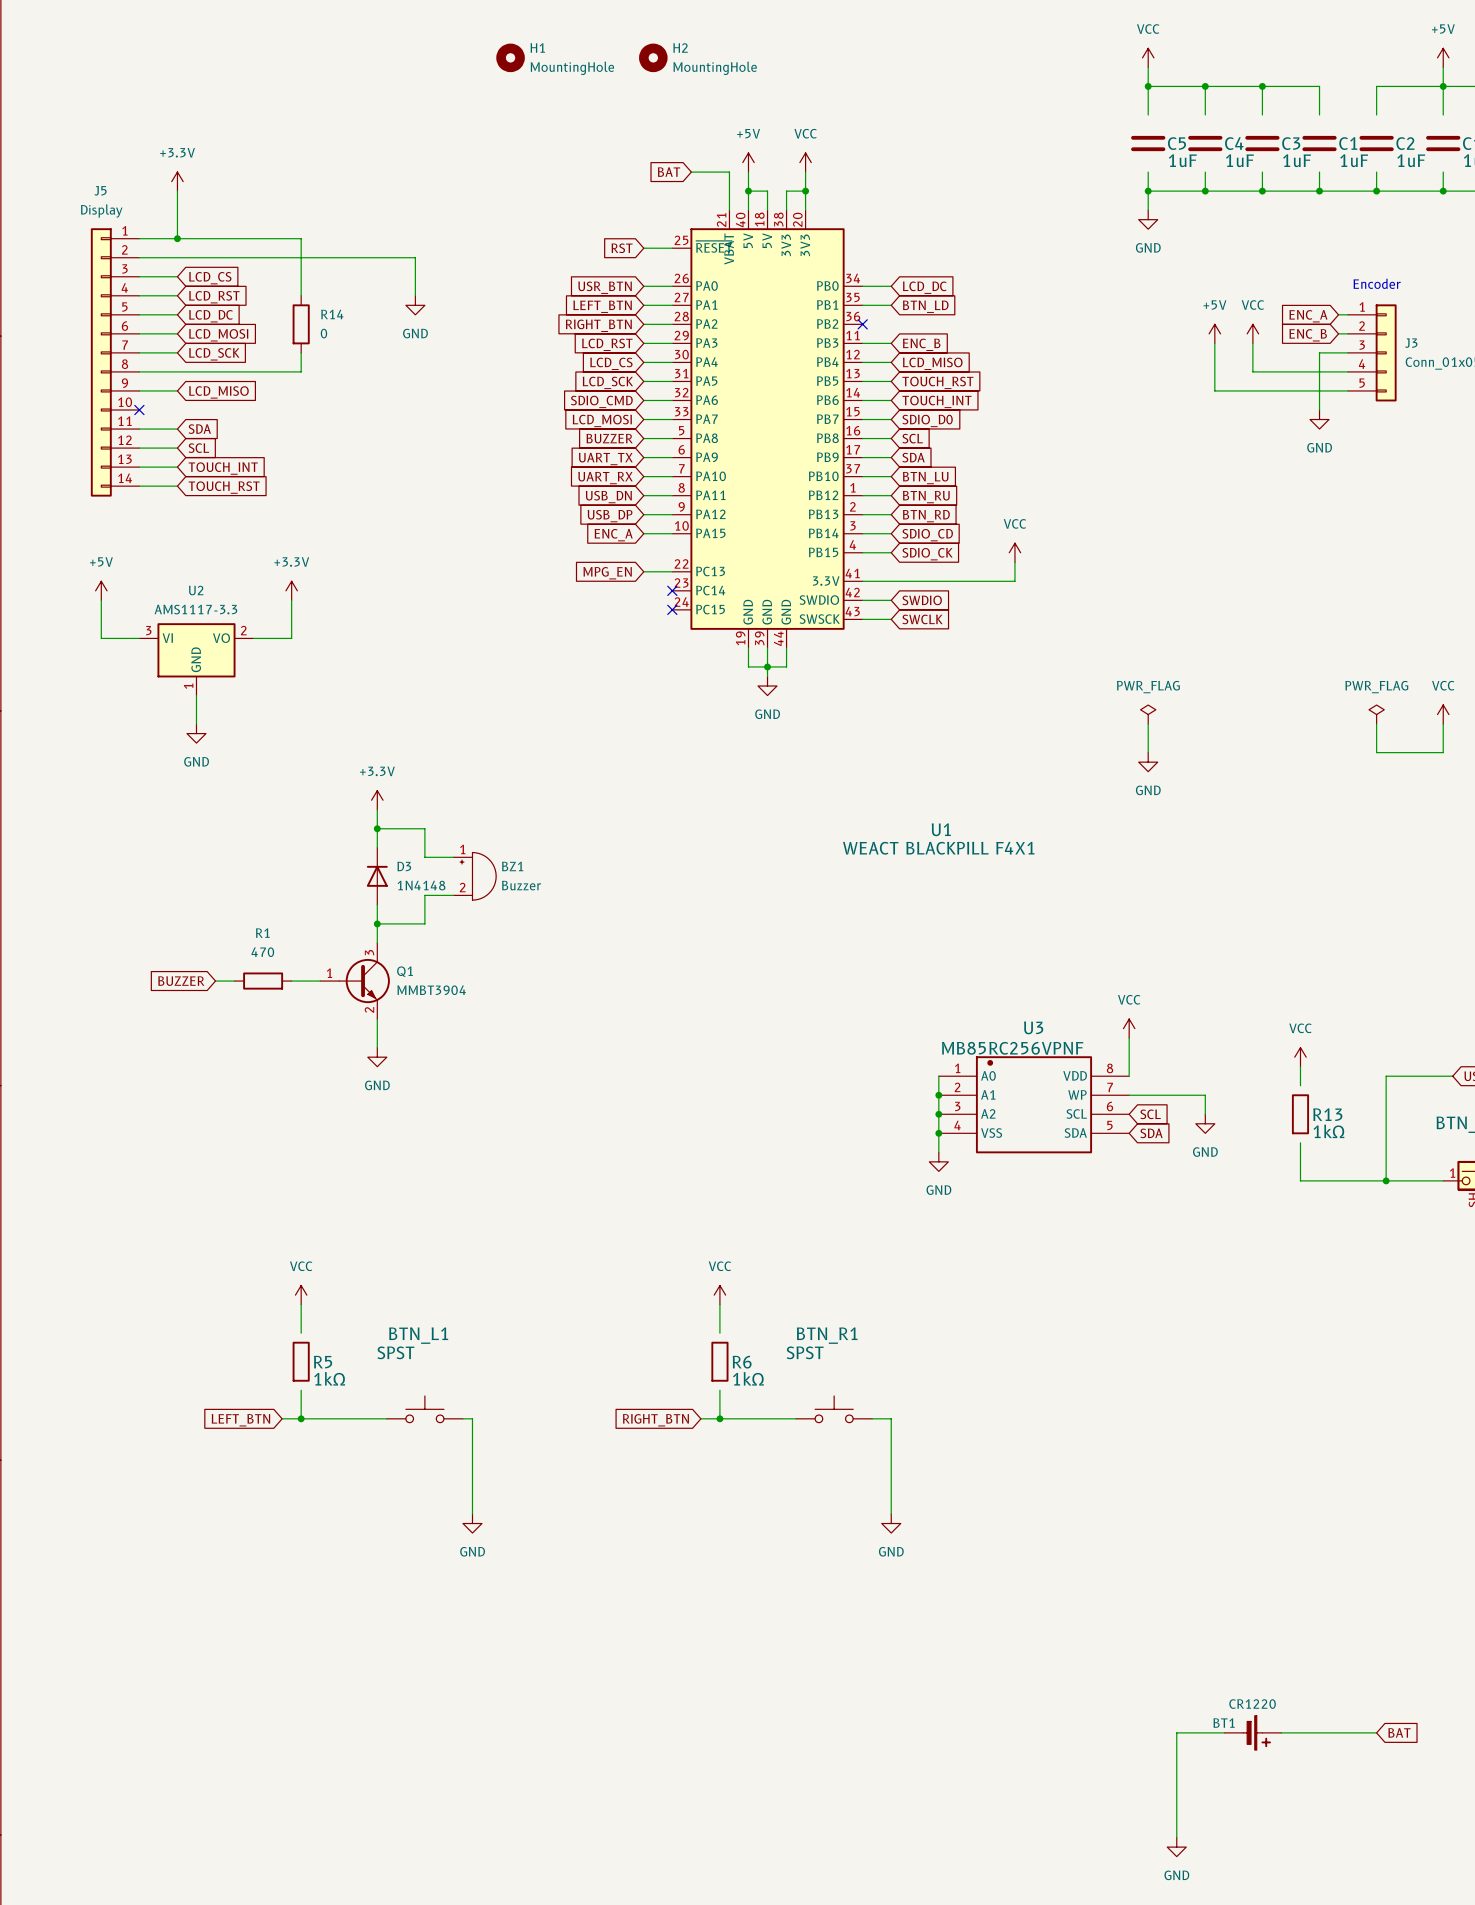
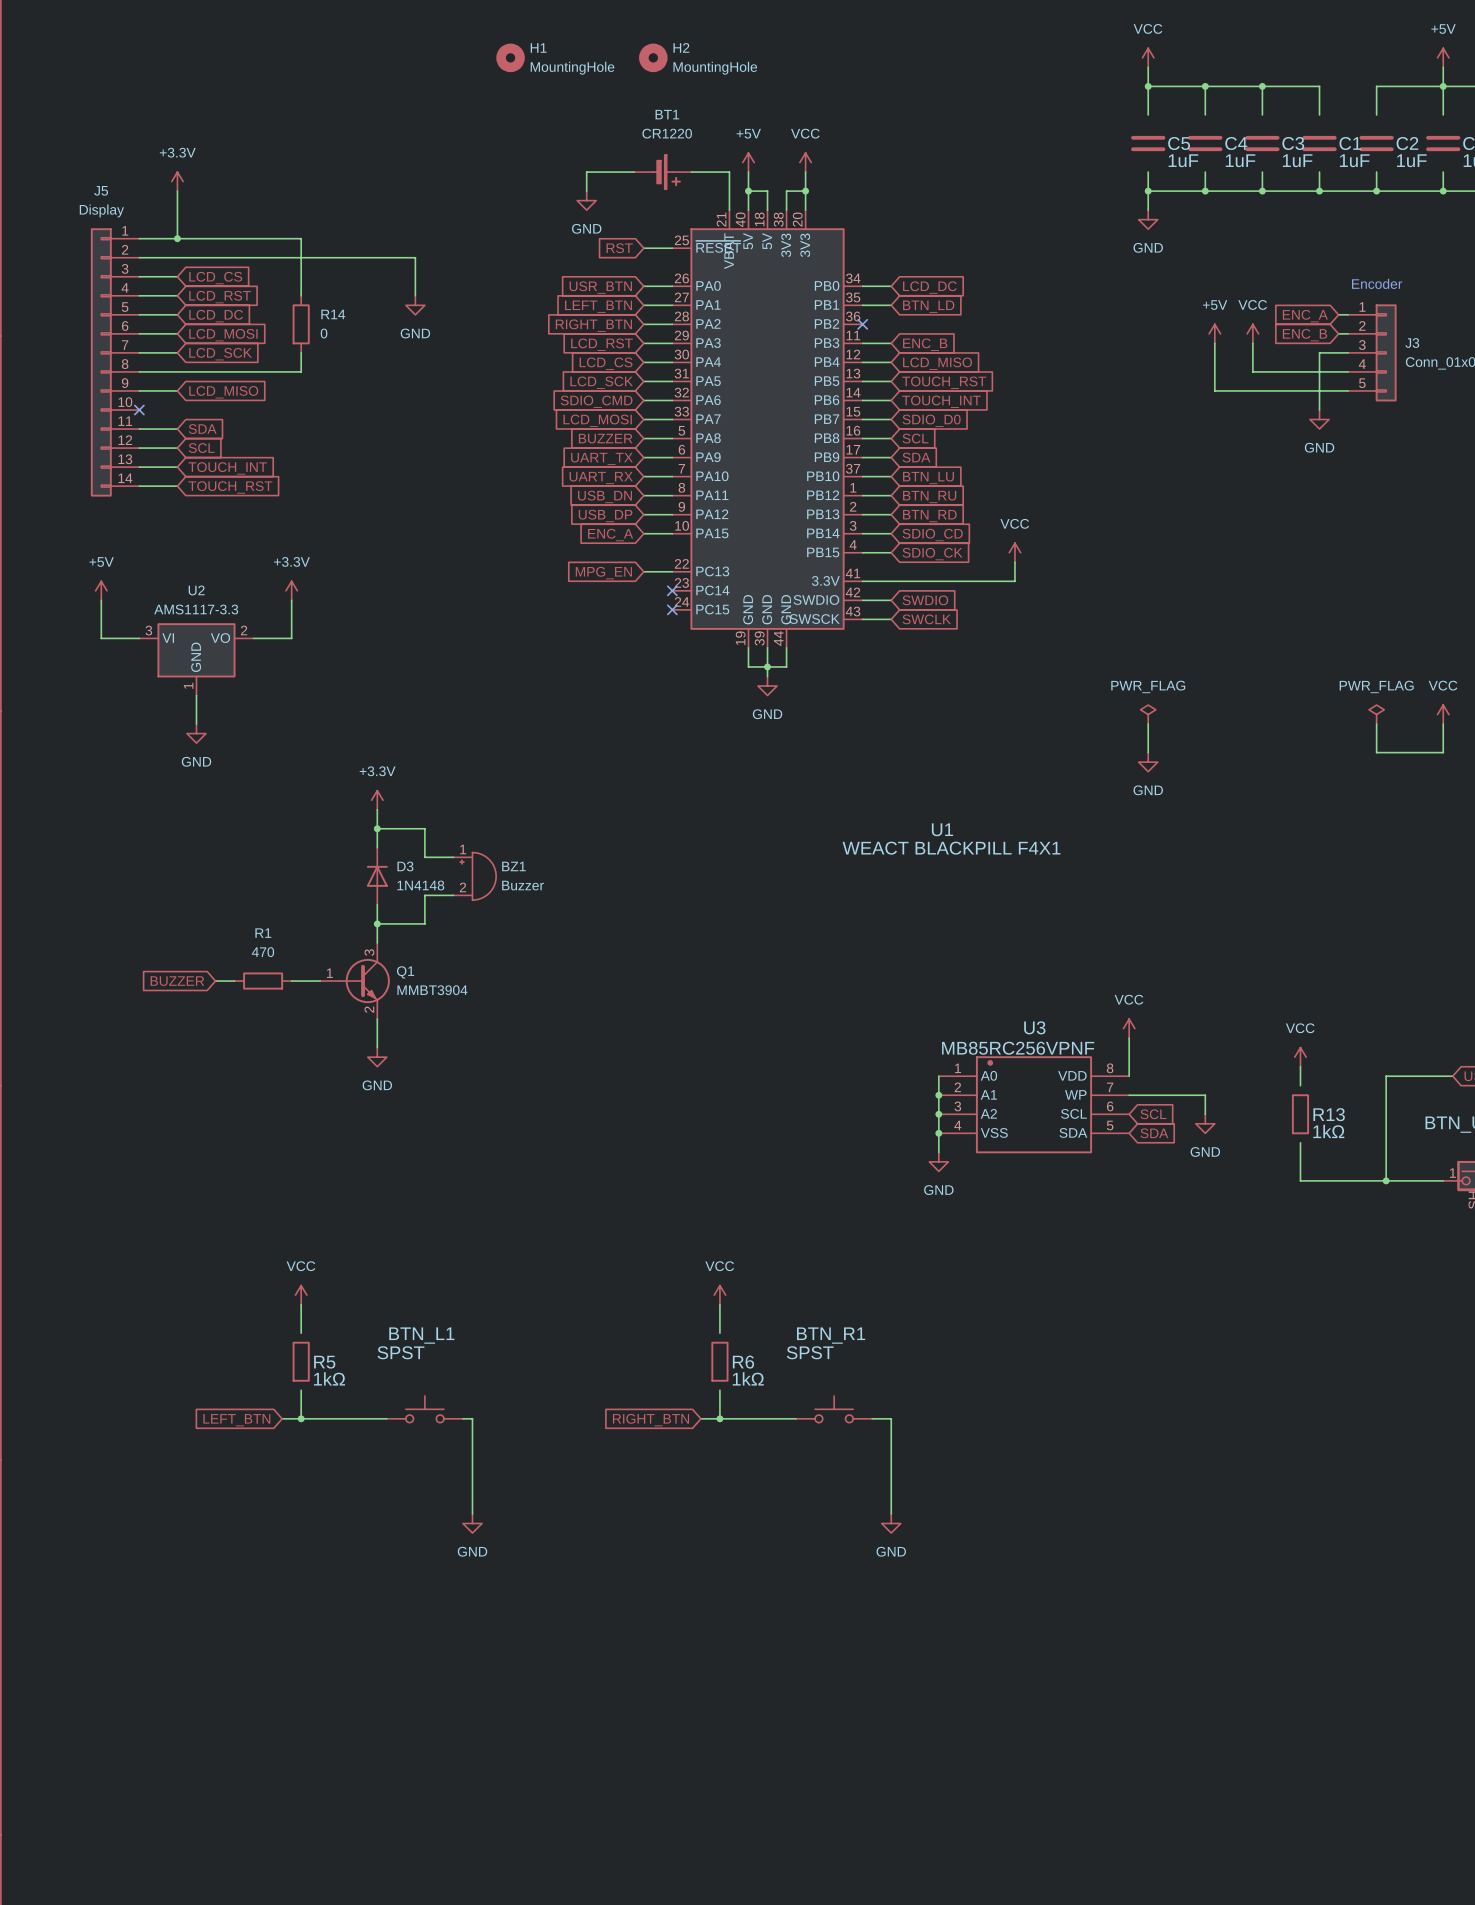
wire: none -> (634, 172) (586, 172) (586, 191)
global label: BAT (669, 172) -> none
power symbol: none -> GND (586, 200)
BT1 value position: CR1220 (1252, 1704) -> CR1220 (667, 133)
BT1 name position: BT1 (1224, 1723) -> BT1 (667, 114)
wire: (1224, 1732) (1176, 1732) (1176, 1837) -> none
BT1 position: (1252, 1732) -> (662, 172)
wire: (1281, 1732) (1376, 1732) -> none
global label: BAT (1399, 1732) -> none
power symbol: GND (1176, 1847) -> none

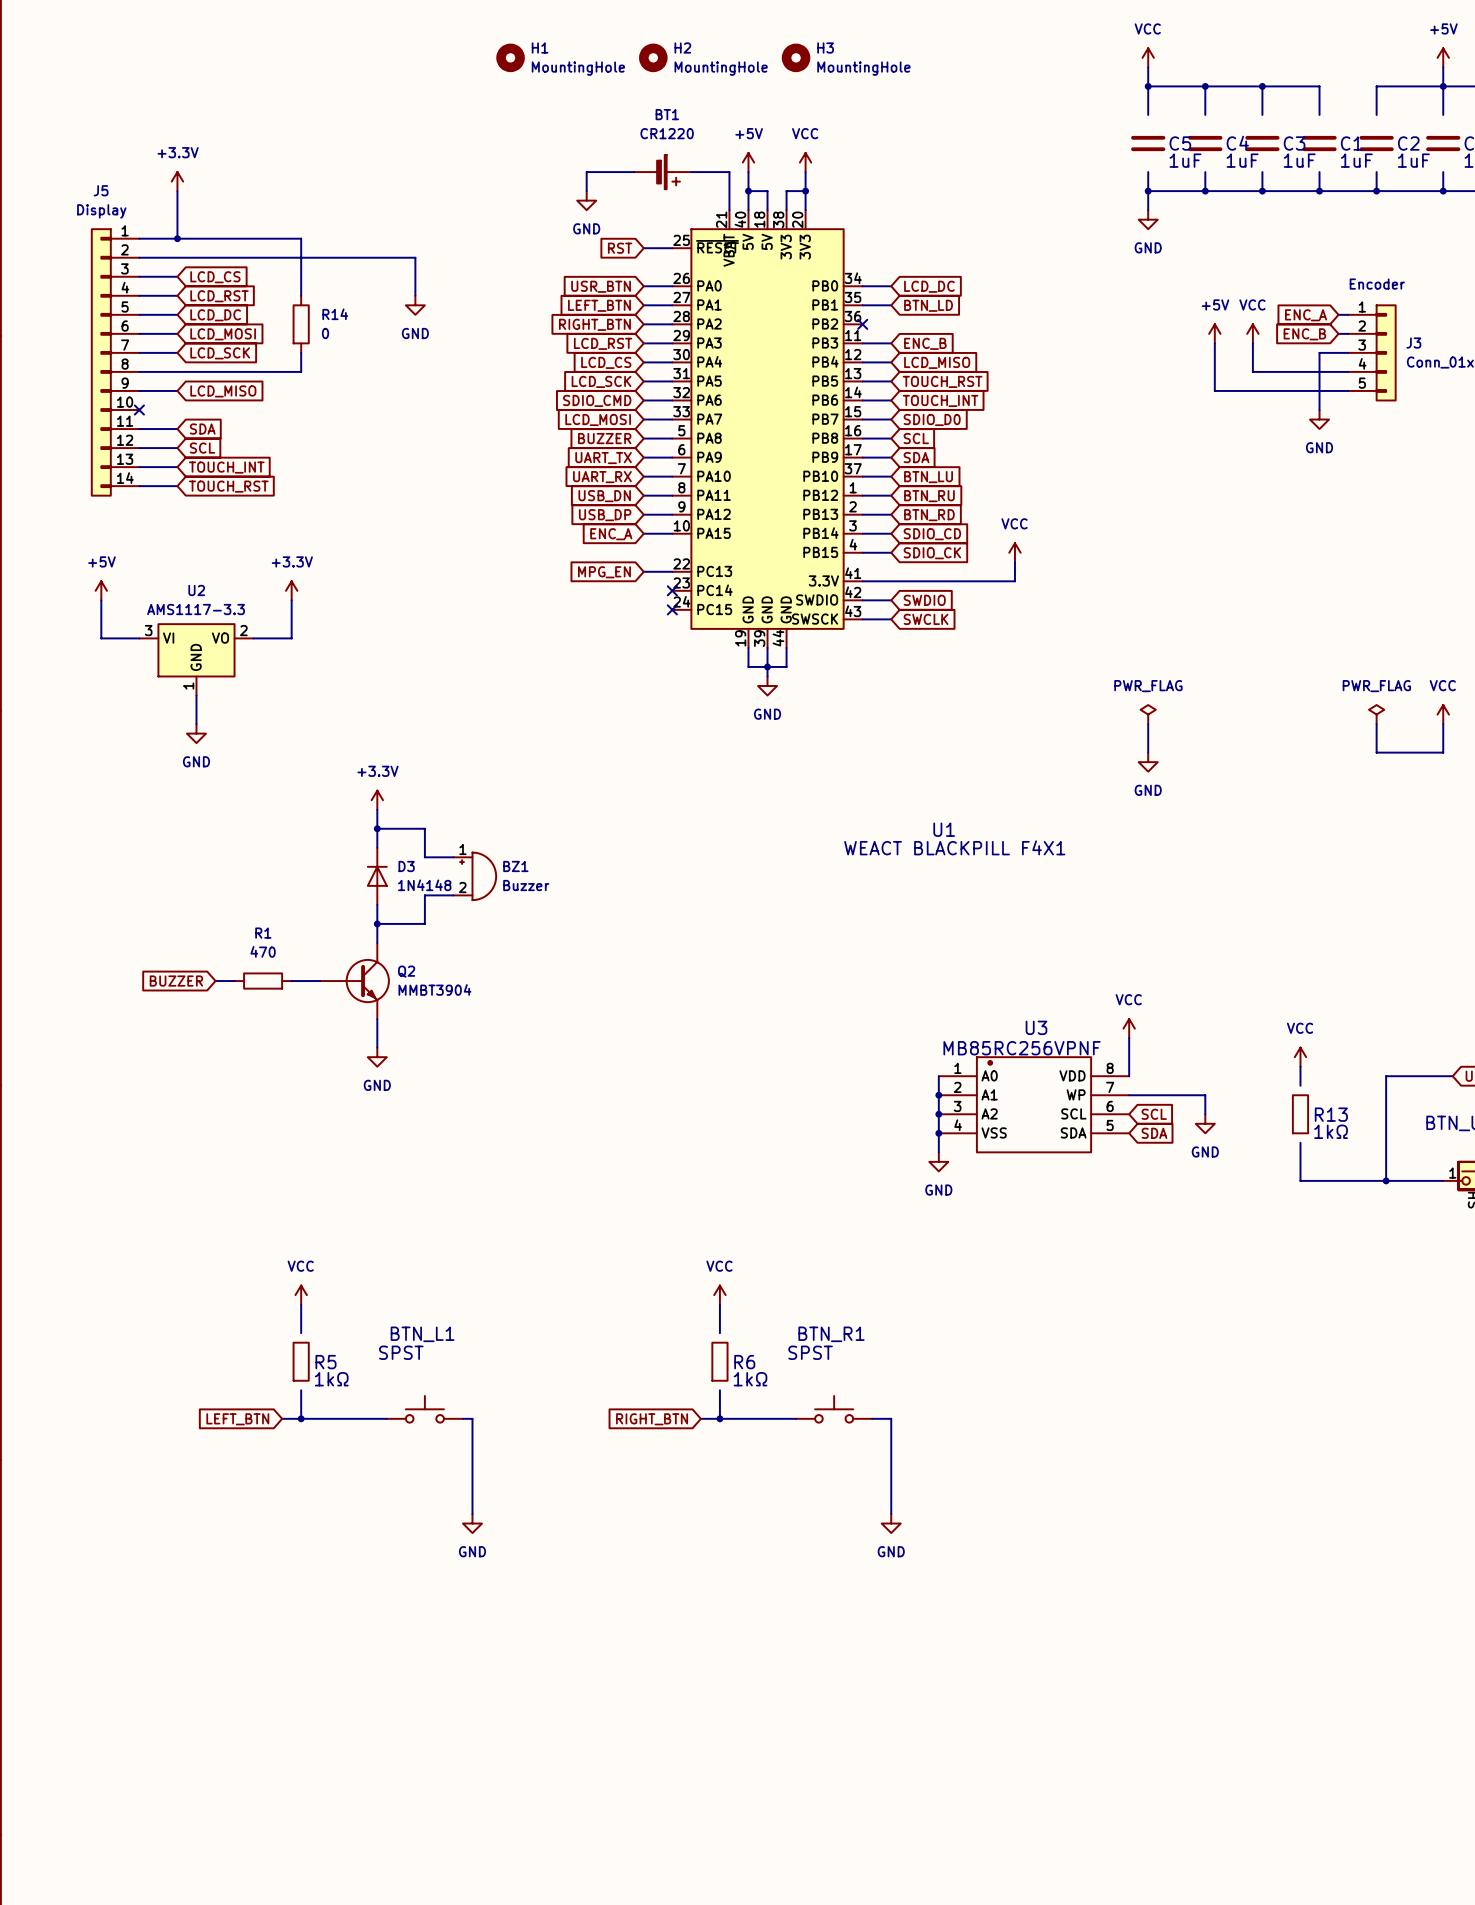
H3: none -> MountingHole (796, 57)
Q1 pin number: 3 (369, 952) -> none
Q1 name: Q1 (405, 972) -> Q2 (406, 971)
Q1 pin number: 1 (329, 973) -> none
Q1 pin number: 2 (369, 1009) -> none

